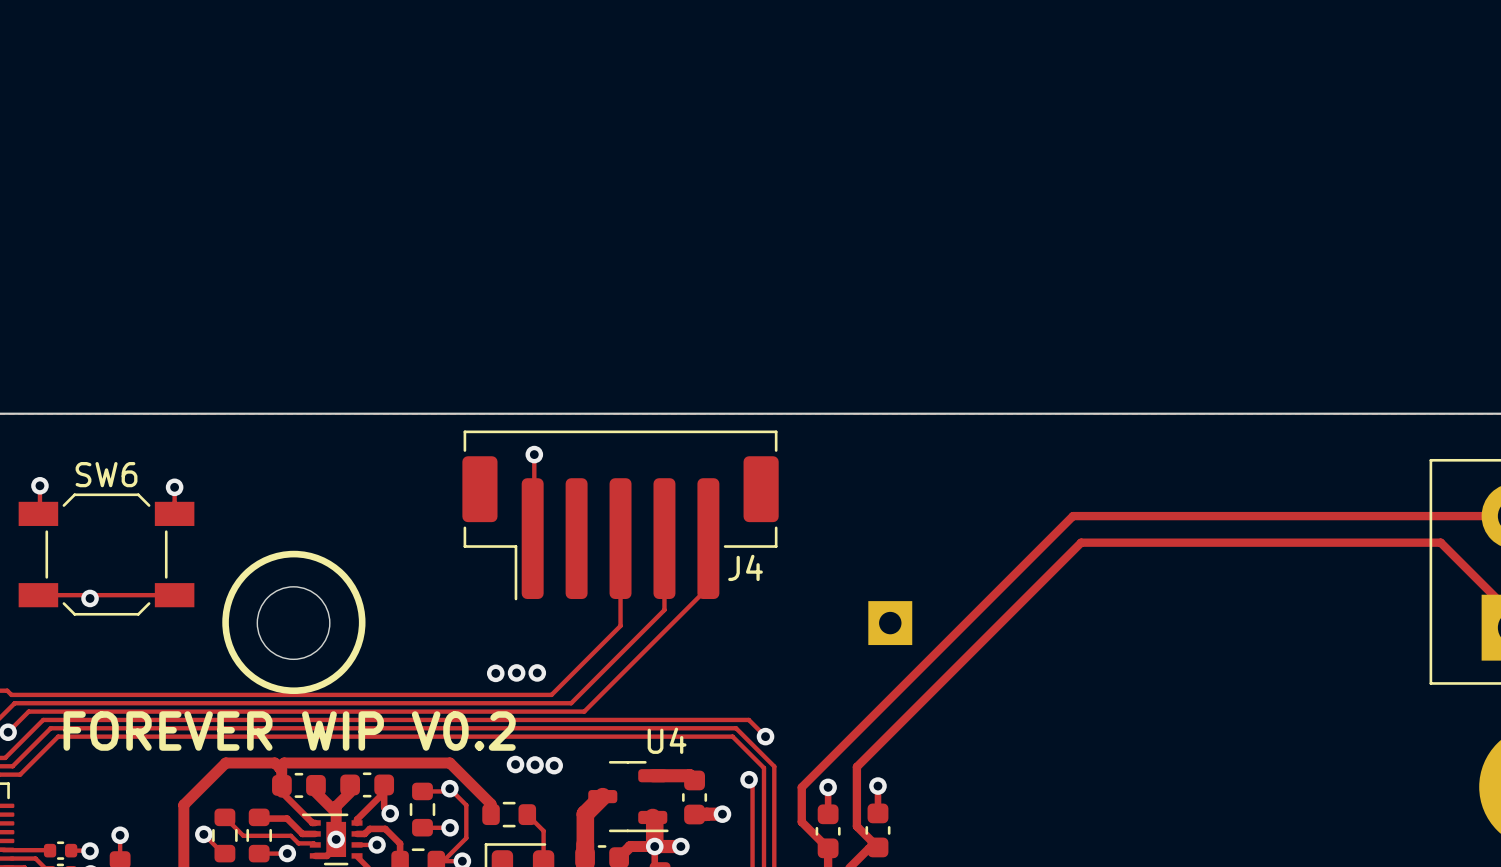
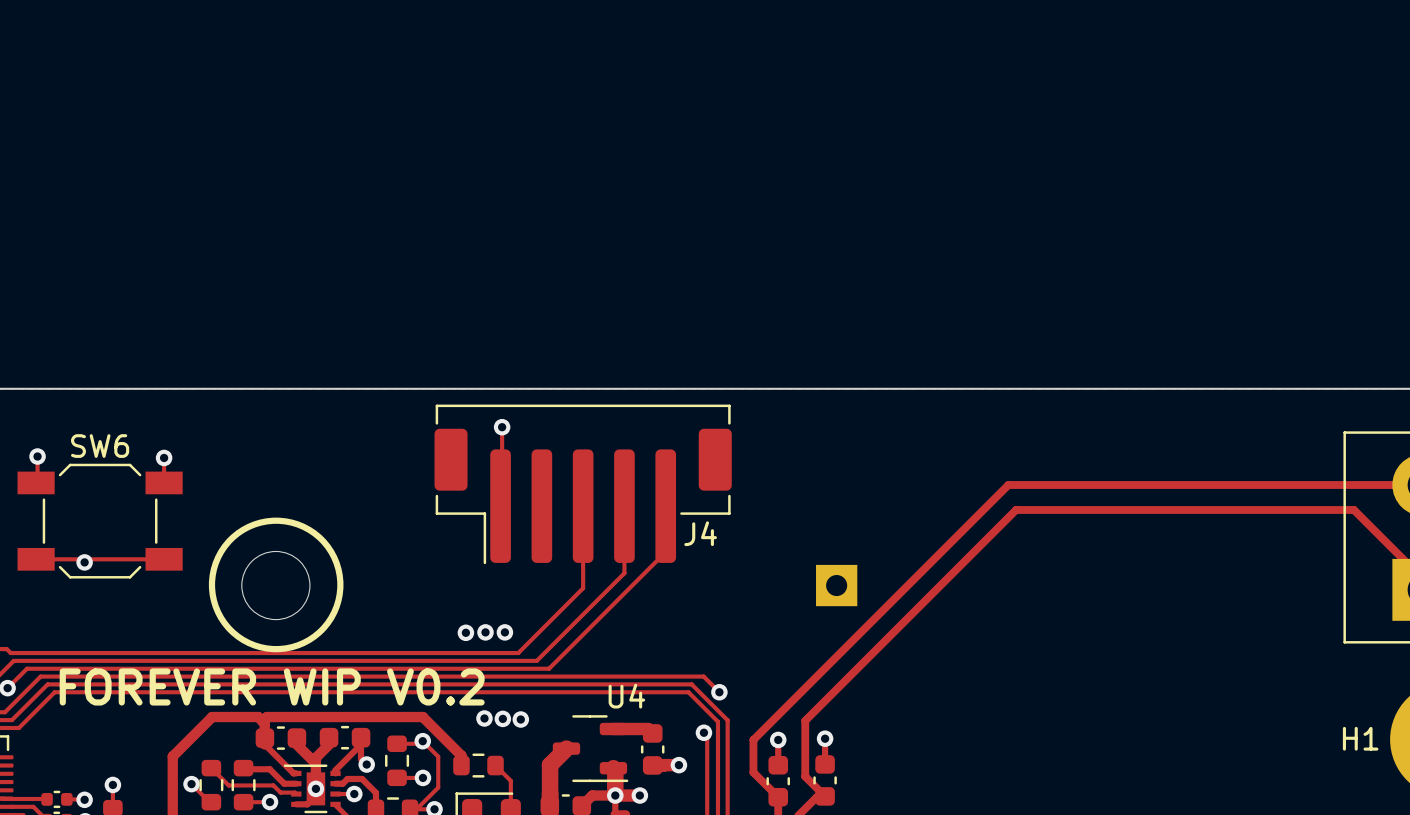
H1 name: none -> H1 (1360, 738)

